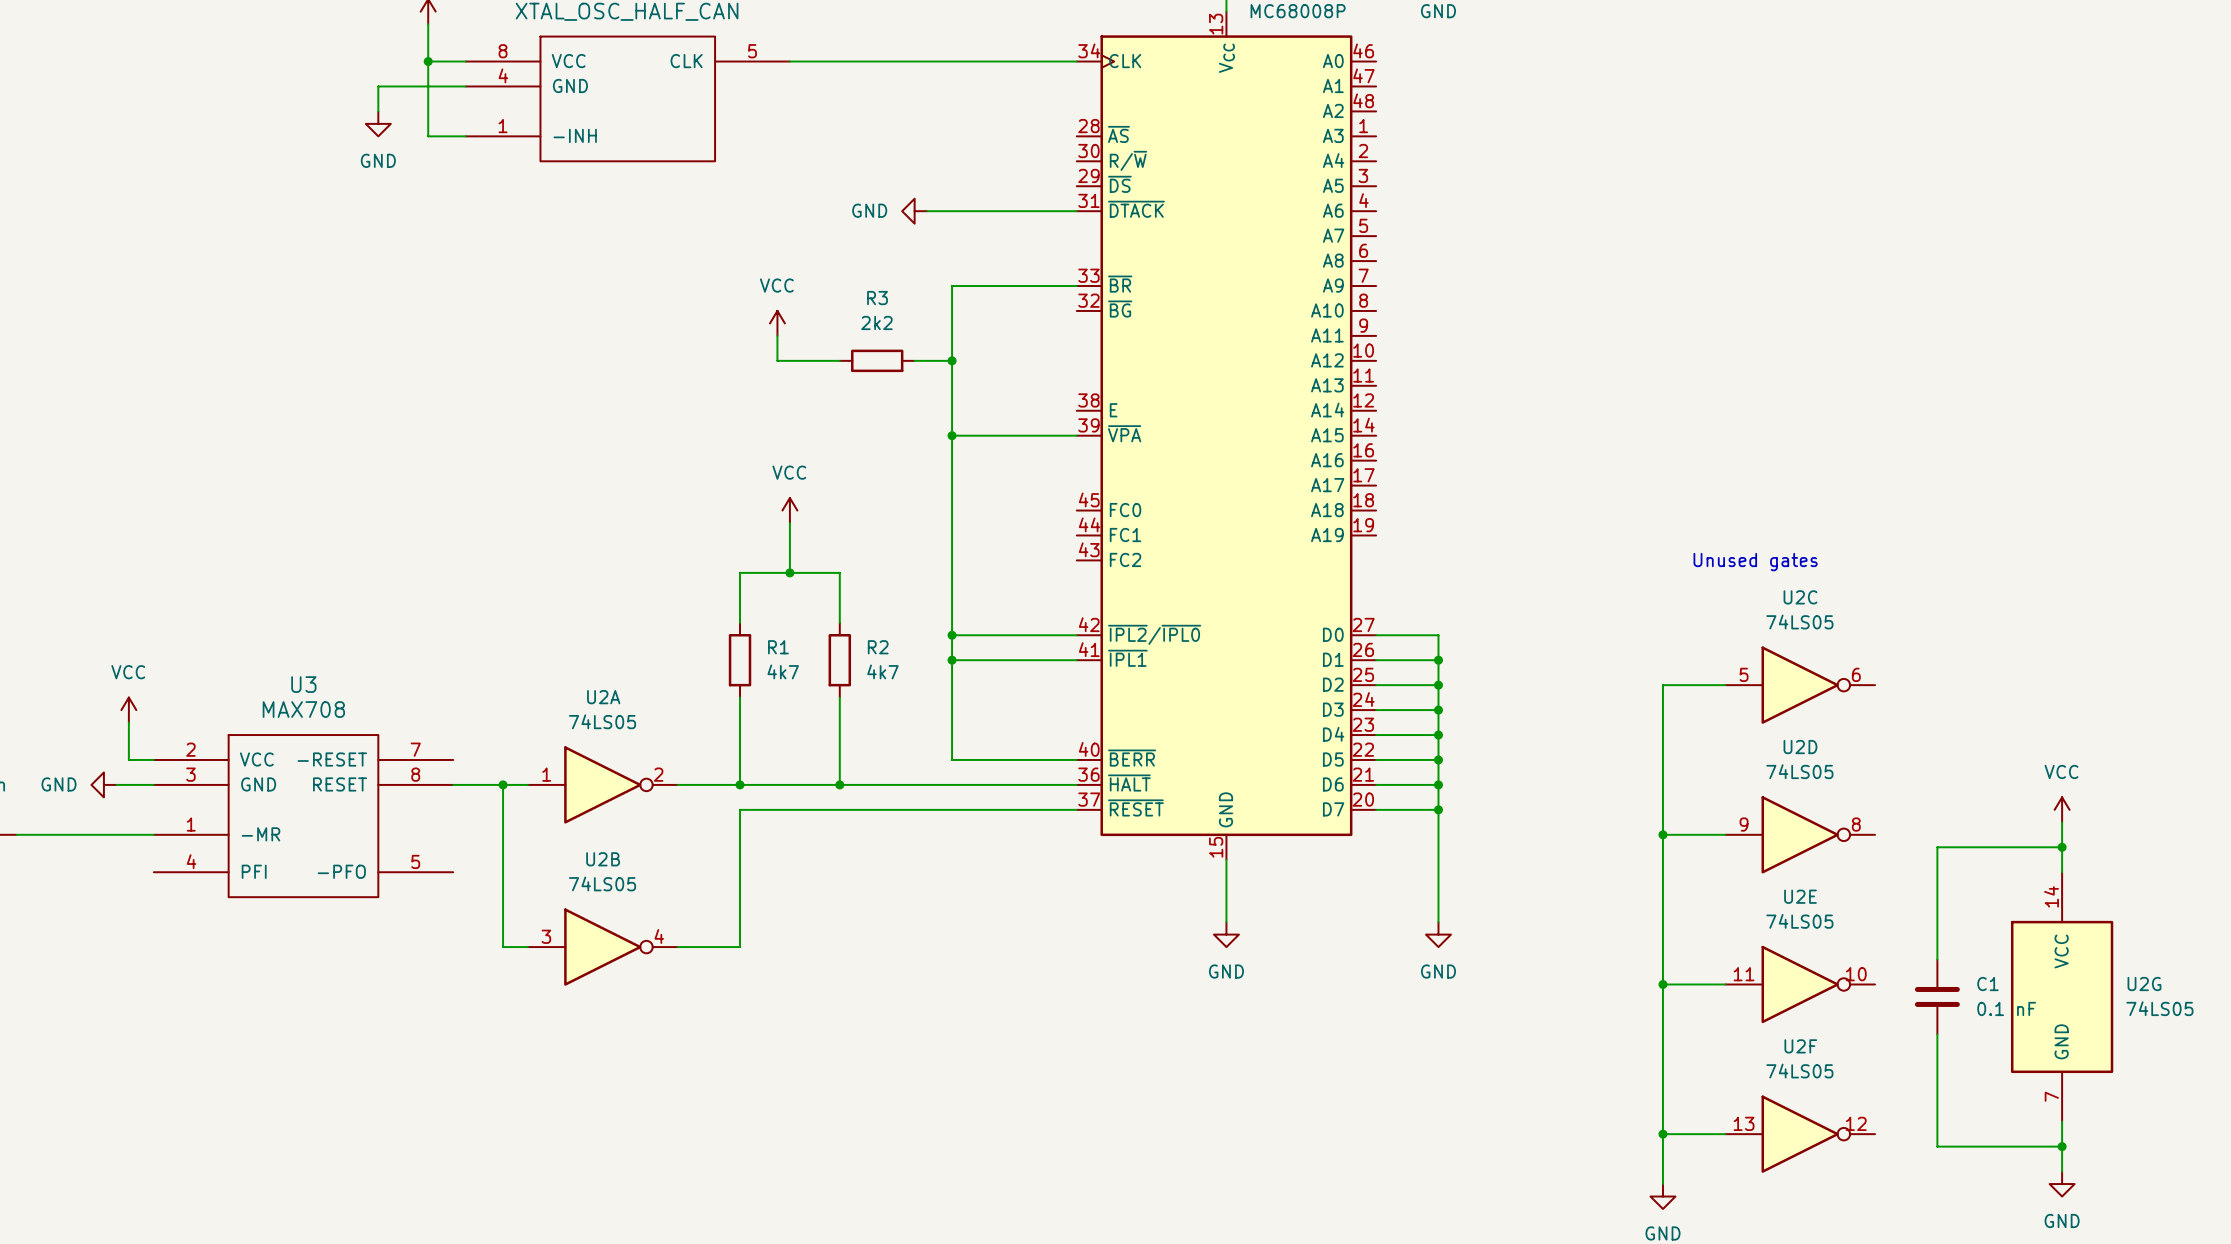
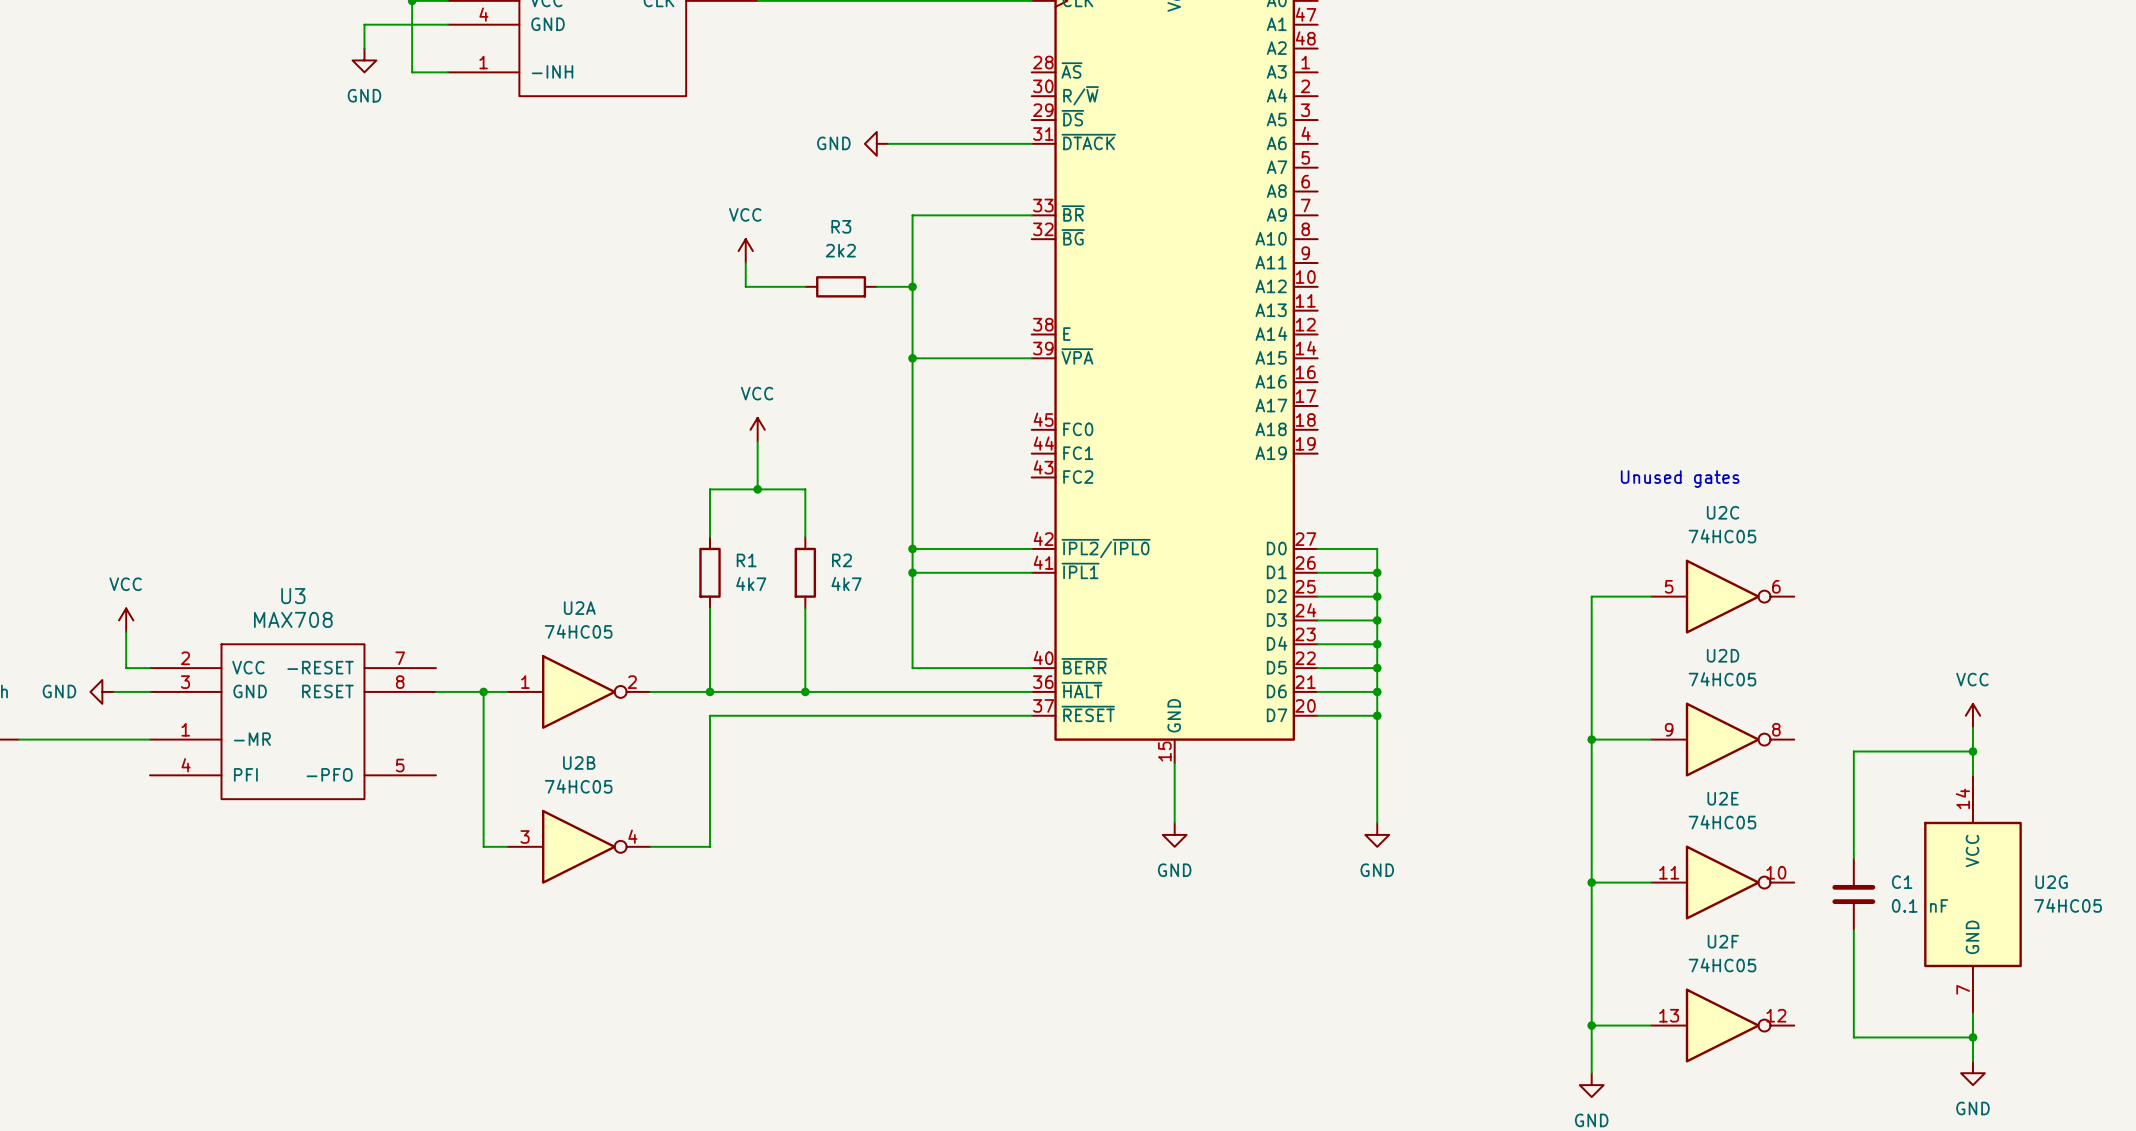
U2C value: 74LS05 (1799, 622) -> 74HC05 (1722, 536)
U2A value: 74LS05 (602, 721) -> 74HC05 (578, 631)
U2D value: 74LS05 (1799, 771) -> 74HC05 (1722, 679)
U2B value: 74LS05 (602, 883) -> 74HC05 (578, 786)
U2E value: 74LS05 (1799, 921) -> 74HC05 (1722, 822)
U2G value: 74LS05 (2159, 1008) -> 74HC05 (2068, 905)
U2F value: 74LS05 (1799, 1071) -> 74HC05 (1722, 965)

